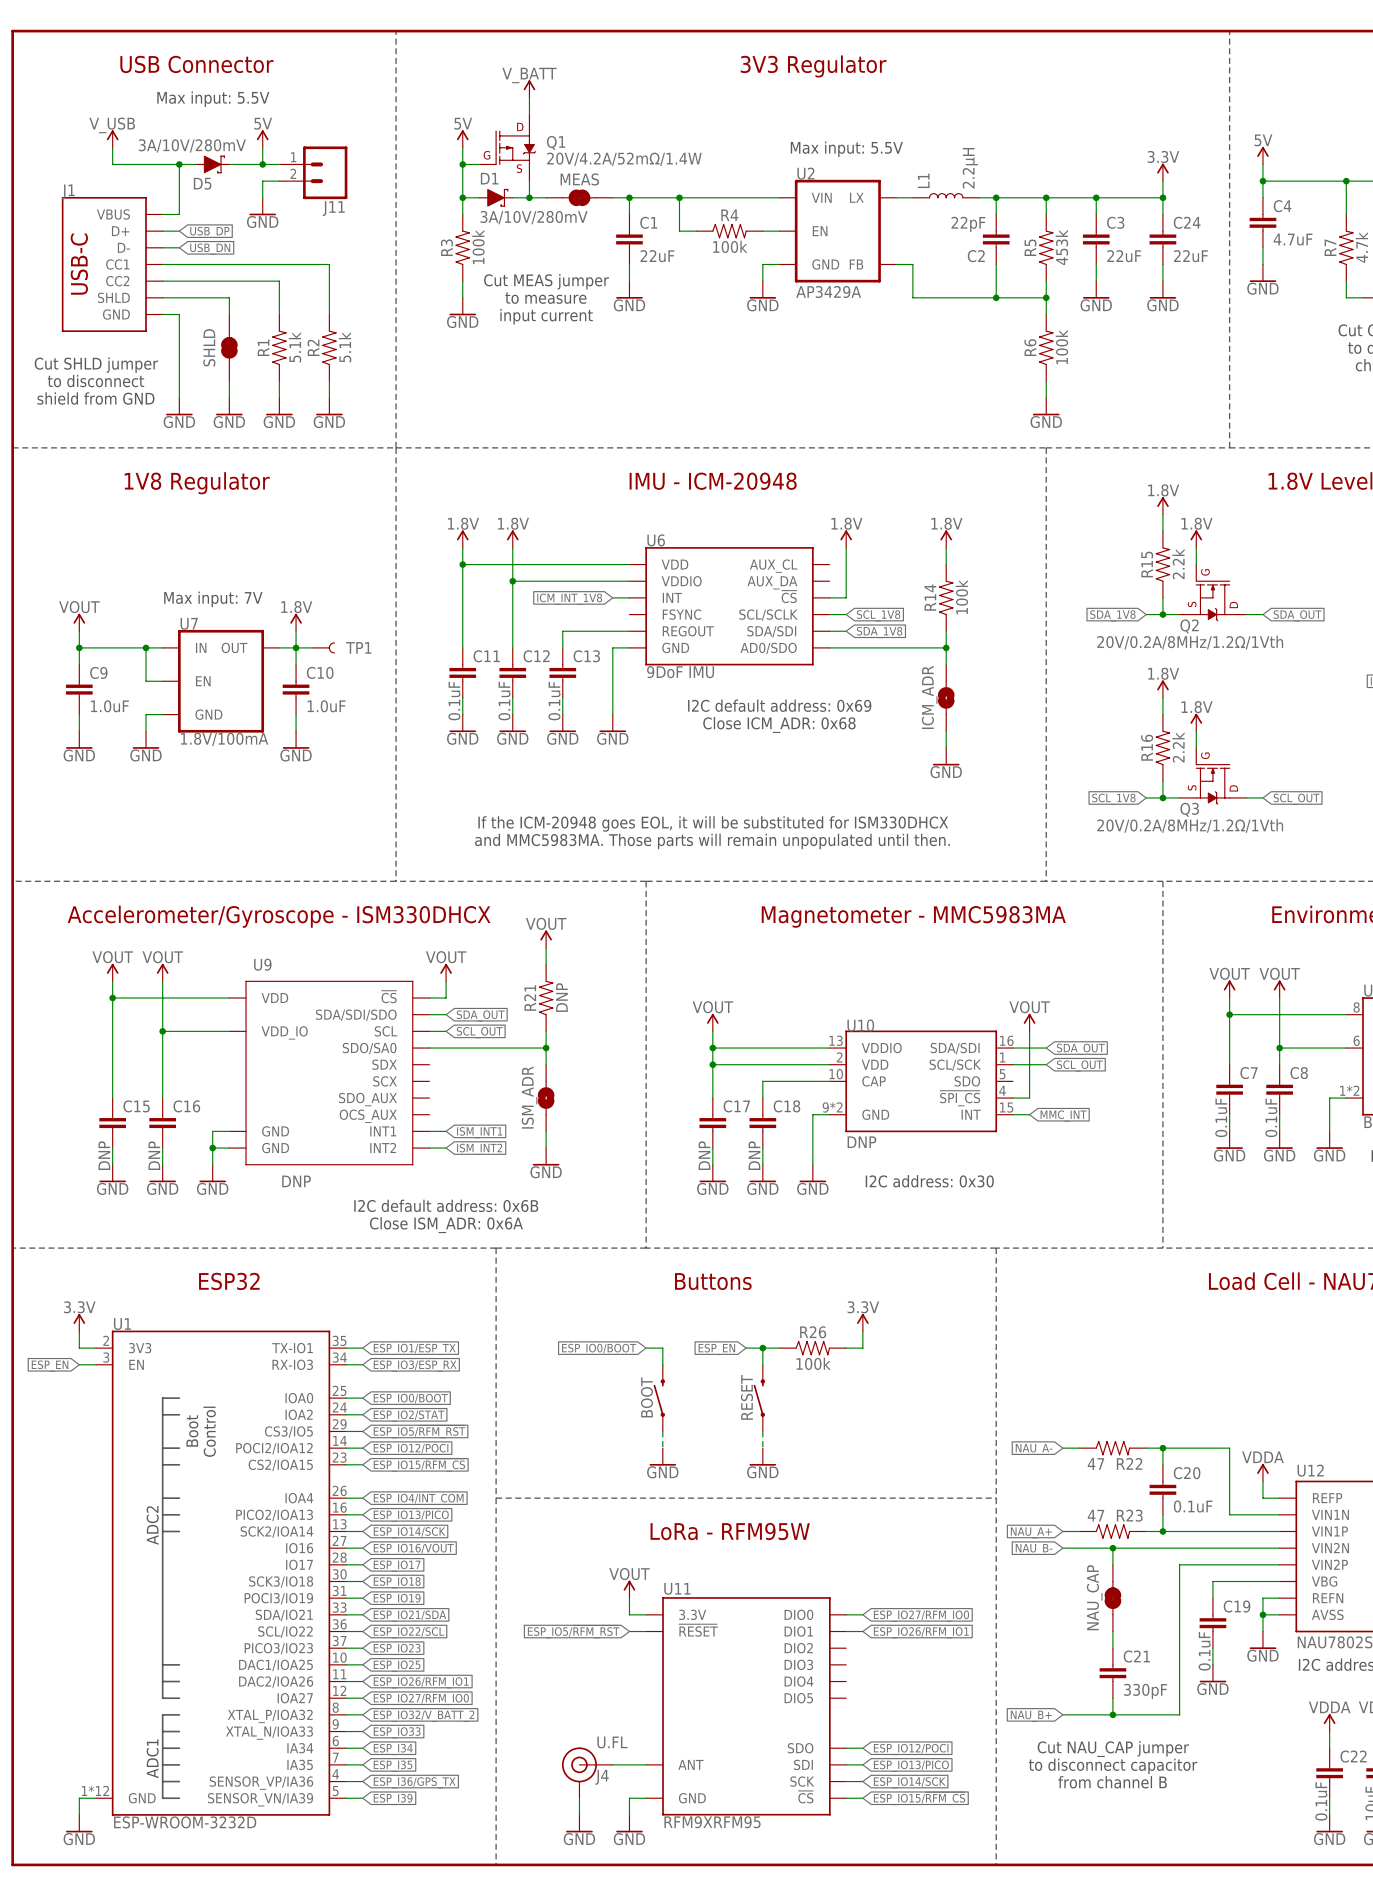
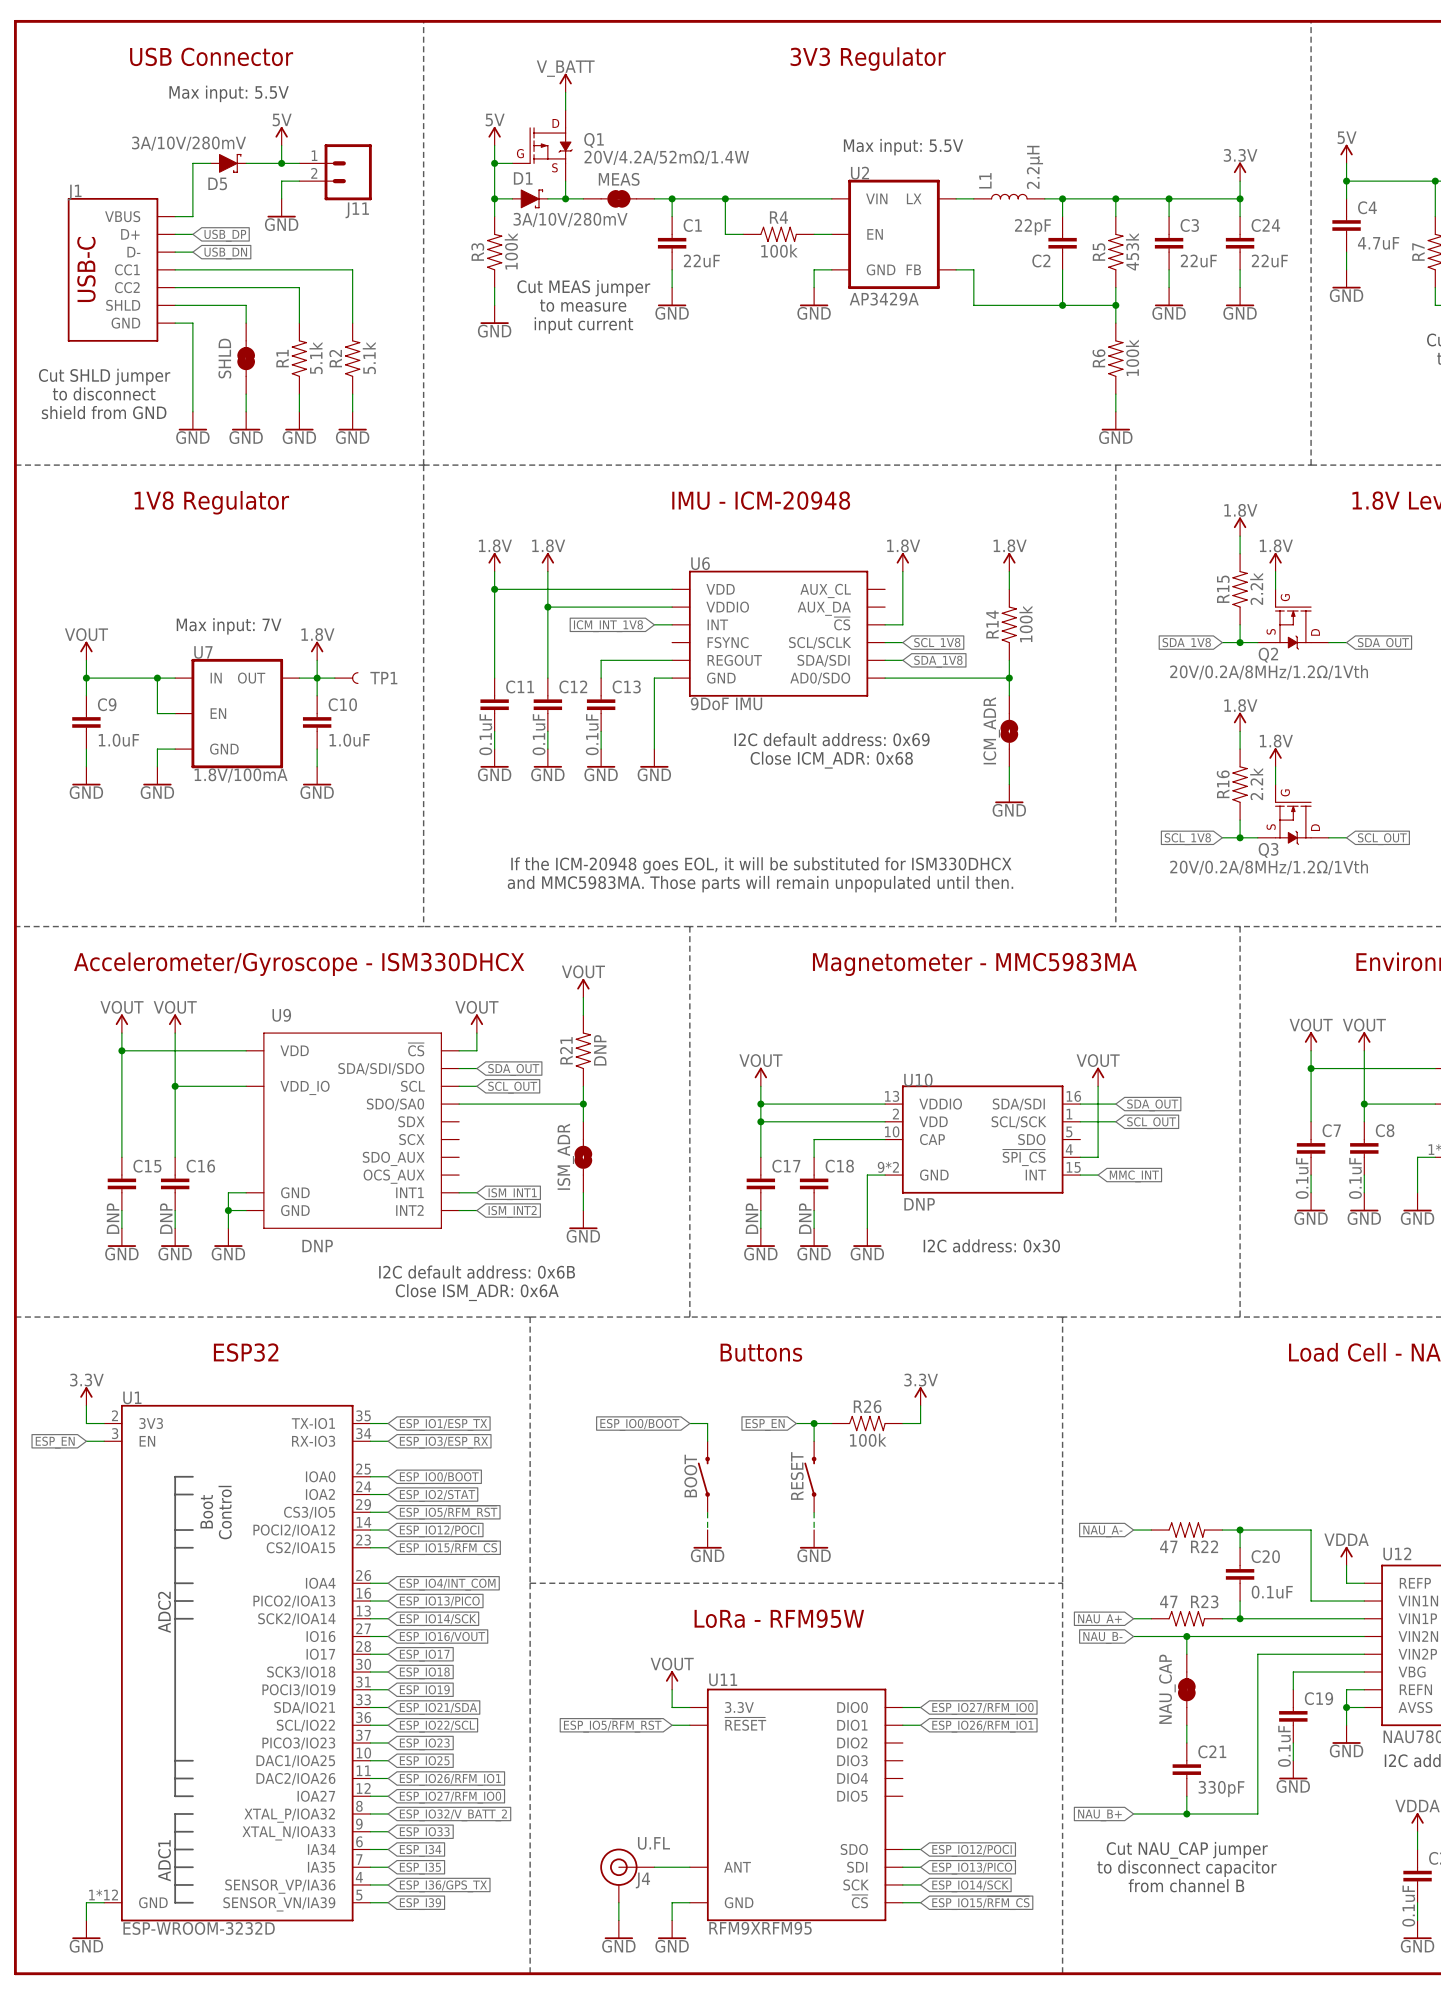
power symbol: V_USB (112, 139) -> none
D5 value position: 3A/10V/280mV (192, 145) -> 3A/10V/280mV (189, 143)
wire: (112, 147) (112, 164) (179, 164) -> none
junction: (179, 164) -> none

